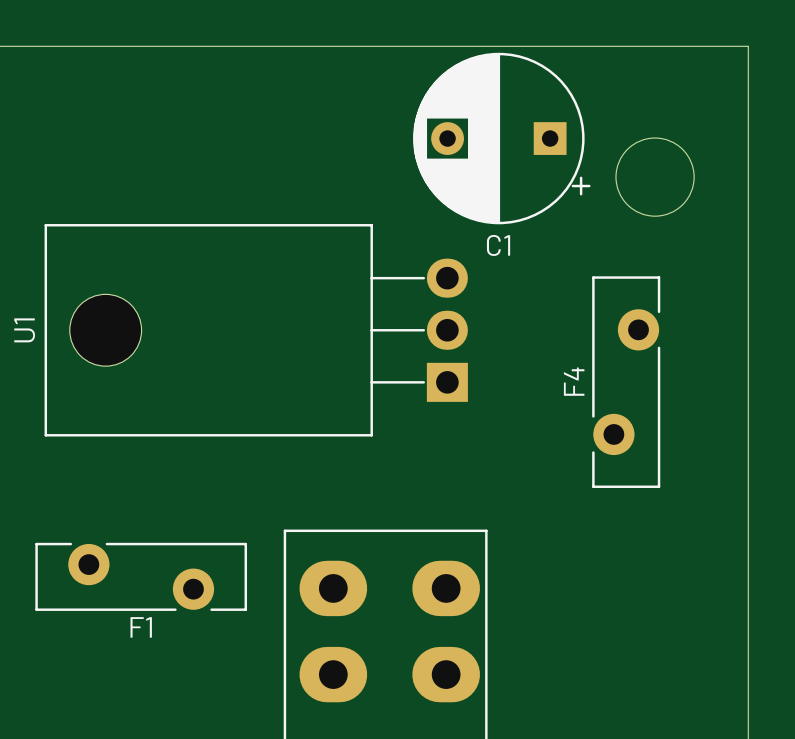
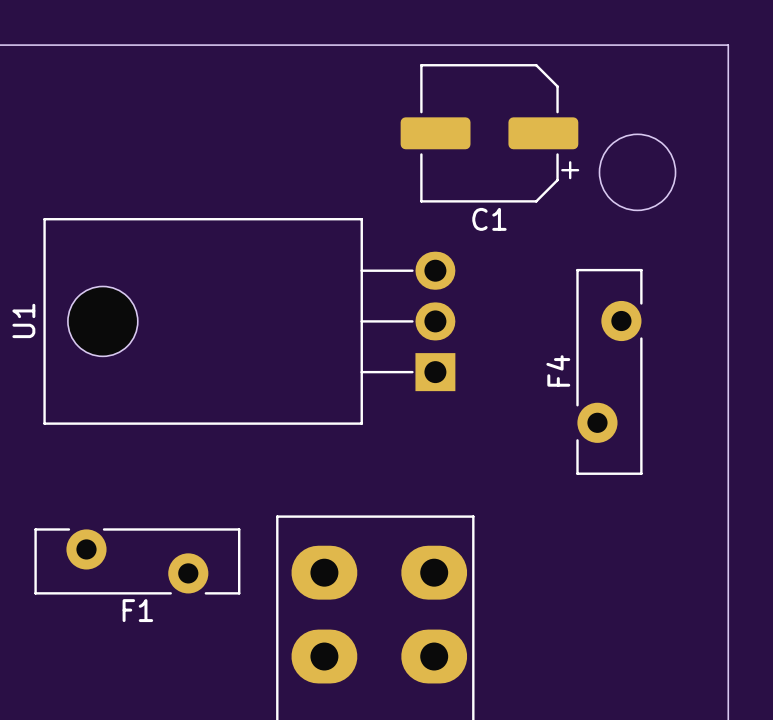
C1 footprint: [413, 52, 591, 225] -> [400, 64, 580, 203]

